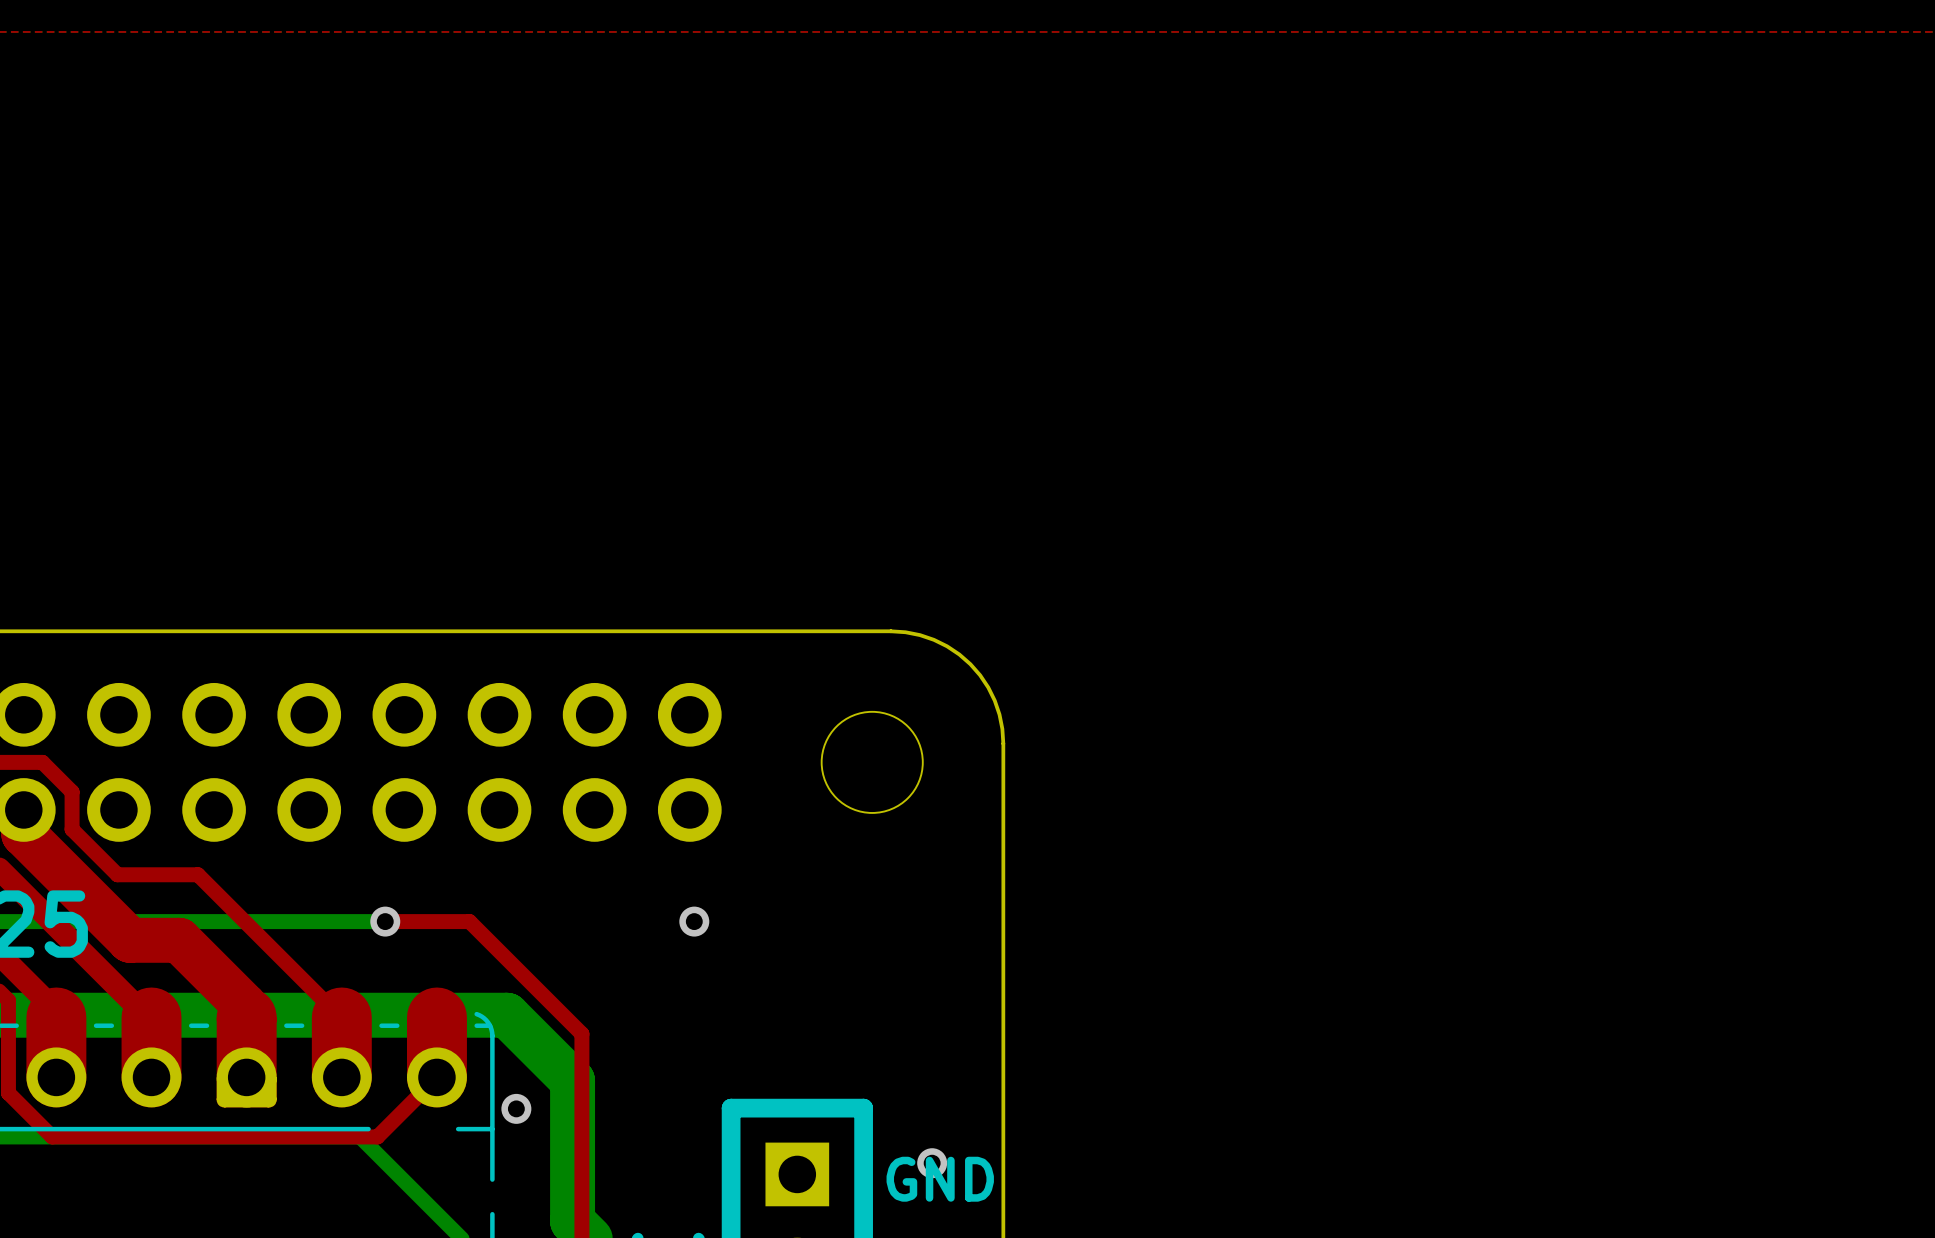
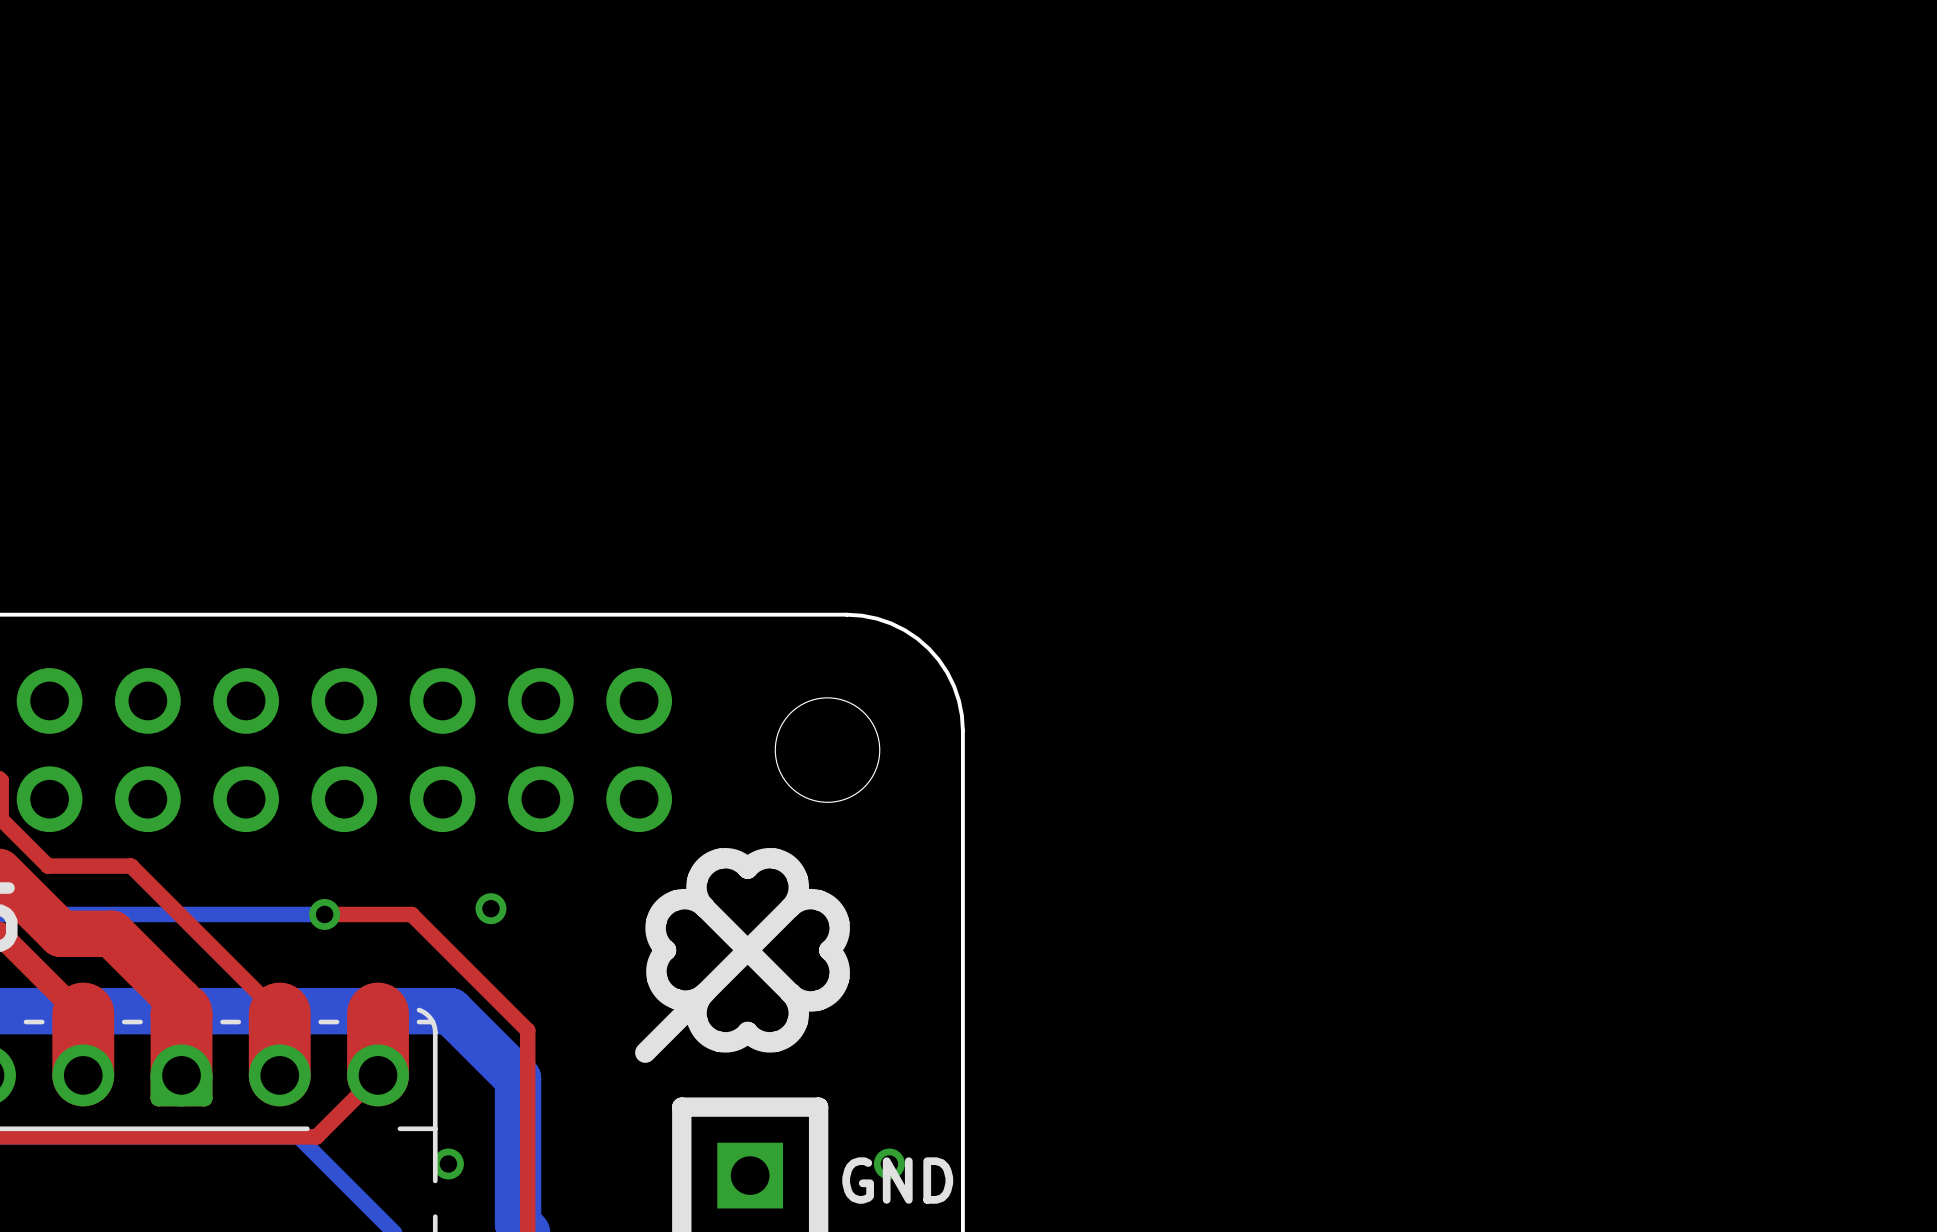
line: none -> (704, 907) (790, 992)
line: none -> (704, 907) (696, 892) (698, 876) (708, 863) (725, 858) (738, 861) (747, 868) (756, 861) (767, 858) (777, 859) (787, 864) (795, 873) (798, 884) (796, 897) (790, 907)
line: none -> (704, 907) (689, 899) (674, 901) (660, 911) (655, 928) (658, 941) (665, 950) (657, 964) (656, 974) (658, 983) (666, 993) (678, 999) (693, 999) (704, 992) (698, 1002) (696, 1014) (698, 1023) (704, 1033) (714, 1040) (723, 1042) (736, 1040) (747, 1031) (755, 1038) (764, 1041) (773, 1042) (783, 1039) (793, 1030) (798, 1017) (797, 1004) (790, 992)
line: none -> (790, 907) (645, 1052)
line: none -> (790, 907) (805, 899) (820, 901) (834, 911) (839, 928) (836, 941) (829, 950) (836, 959) (839, 970) (838, 980) (833, 990) (824, 997) (813, 1001) (800, 999) (790, 992)
via: none -> (490, 908)
via: (694, 921) -> none
via position: (516, 1108) -> (448, 1163)

